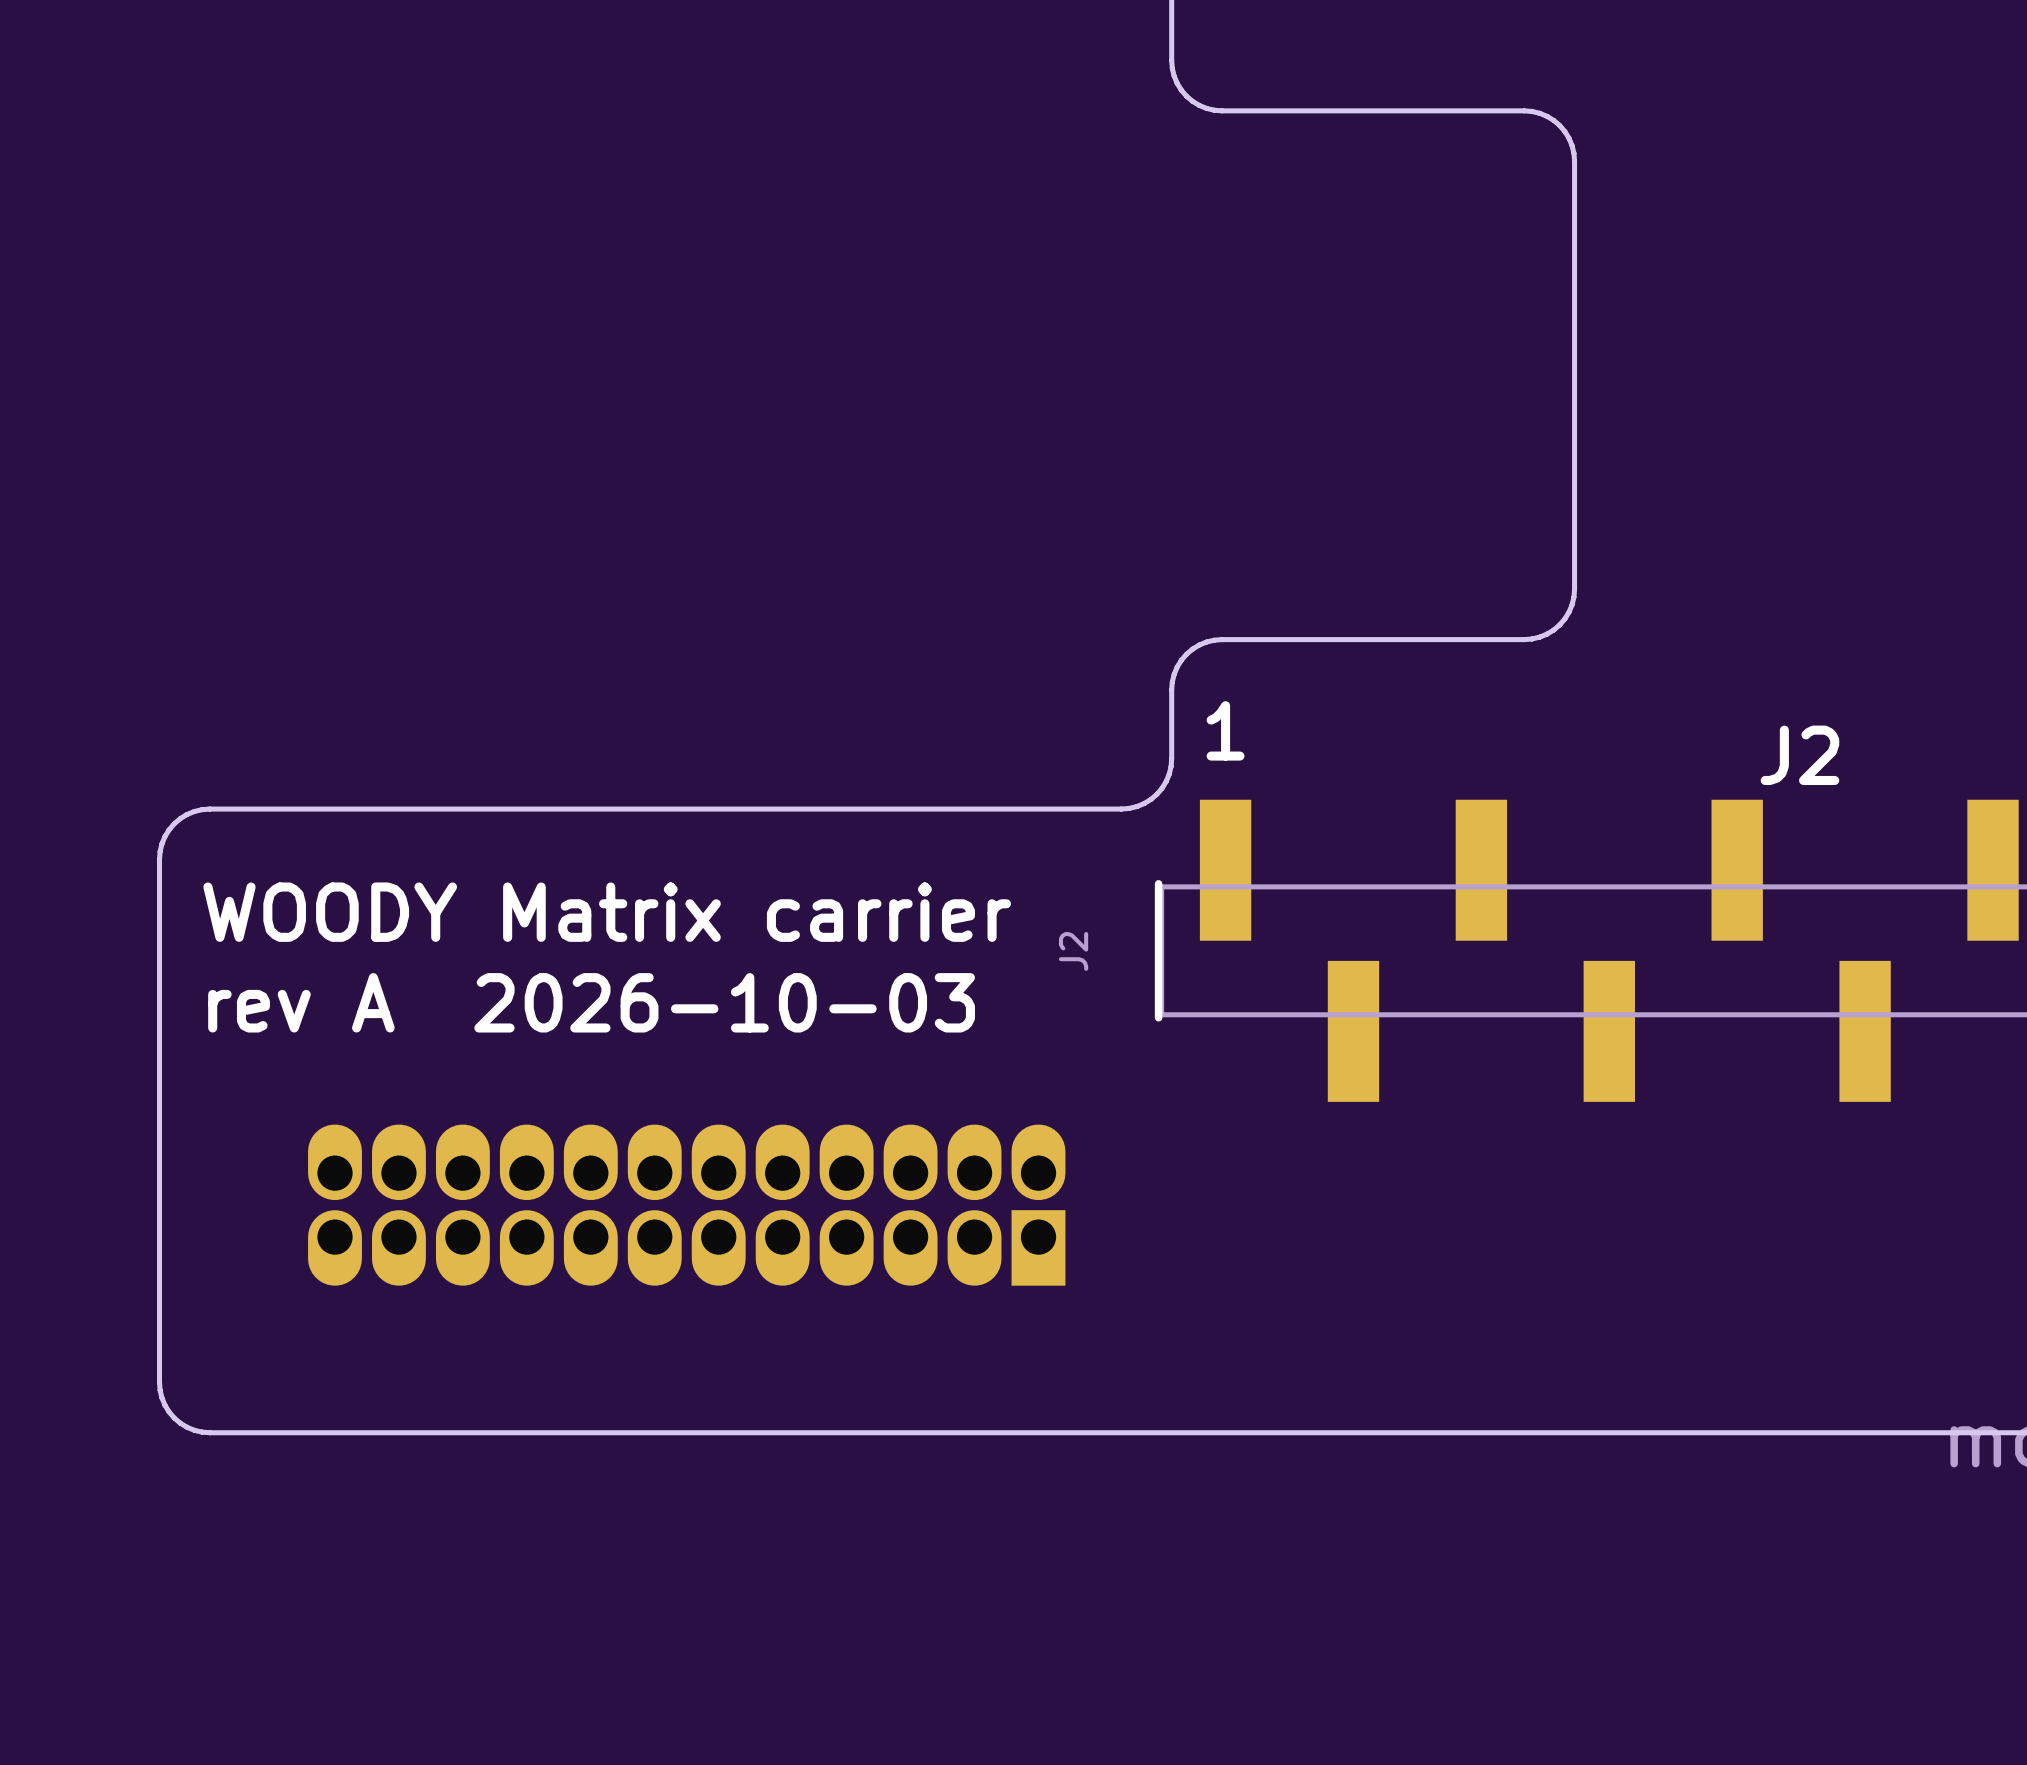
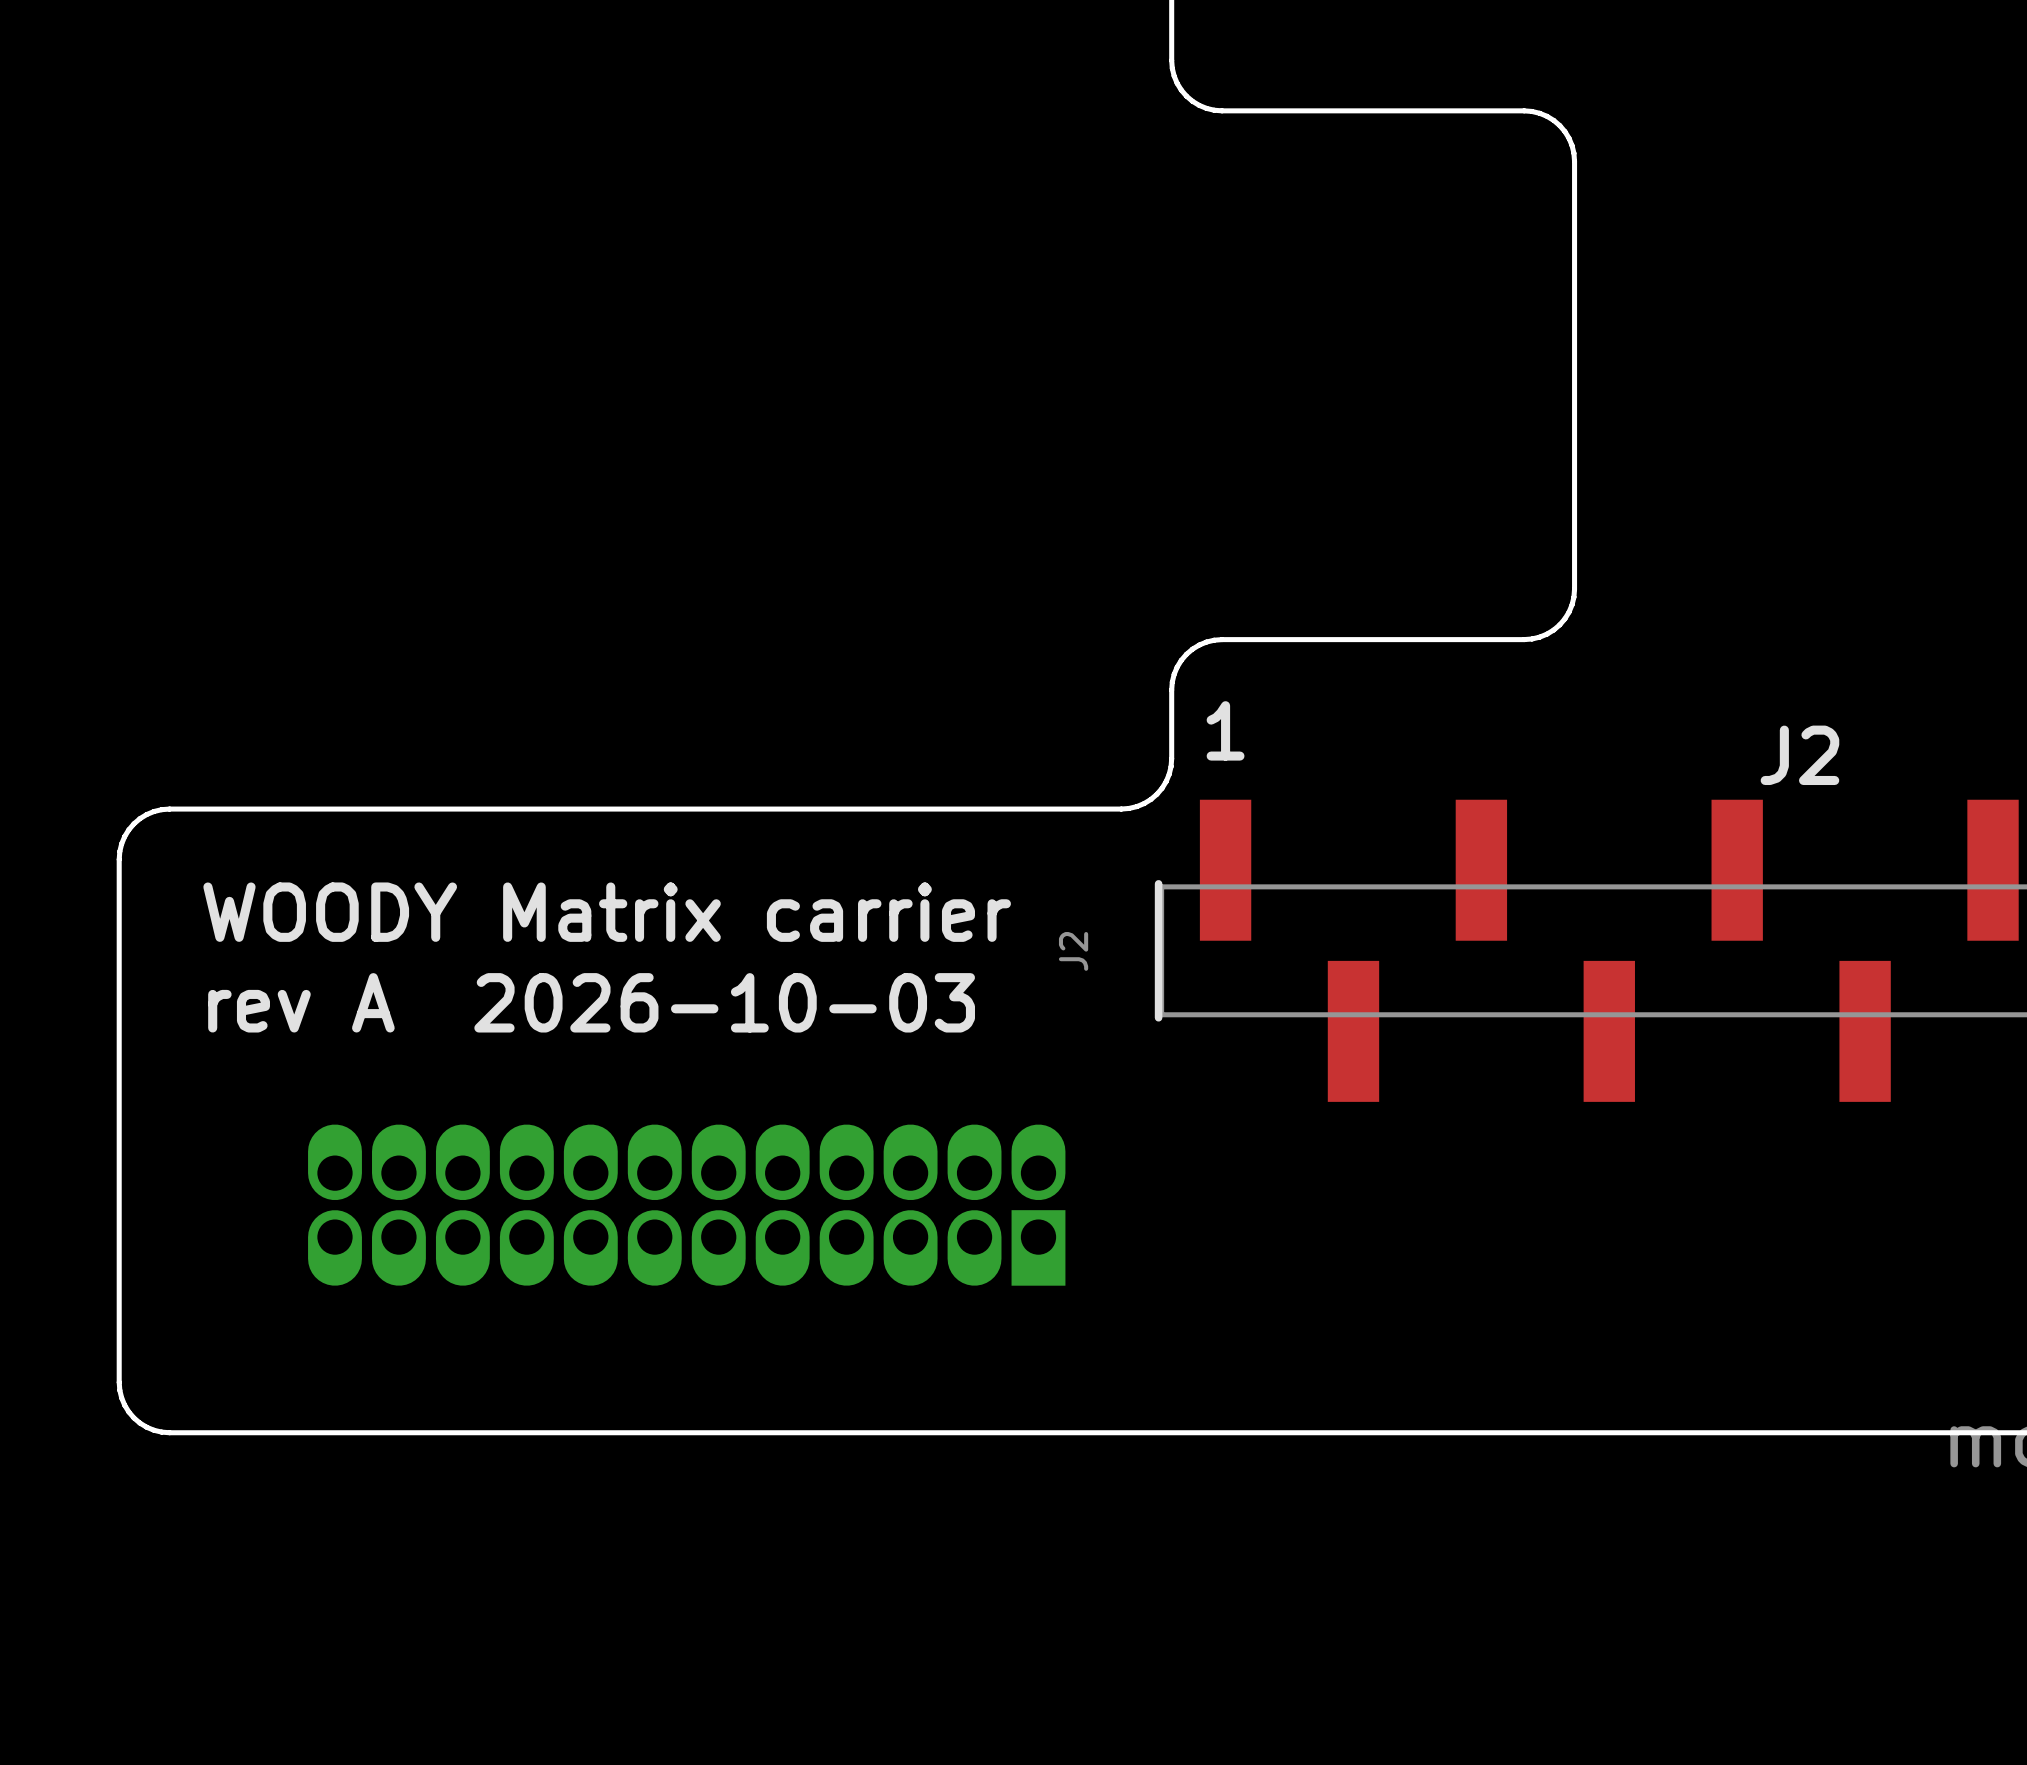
board edge: (209, 809) (186, 814) (174, 823) (164, 836) (159, 859) (160, 1390) (169, 1411) (180, 1423) (194, 1430) (209, 1432) -> (209, 809) (161, 809) (146, 814) (133, 823) (124, 836) (119, 859) (119, 1390) (128, 1411) (146, 1427) (161, 1432) (209, 1432)

